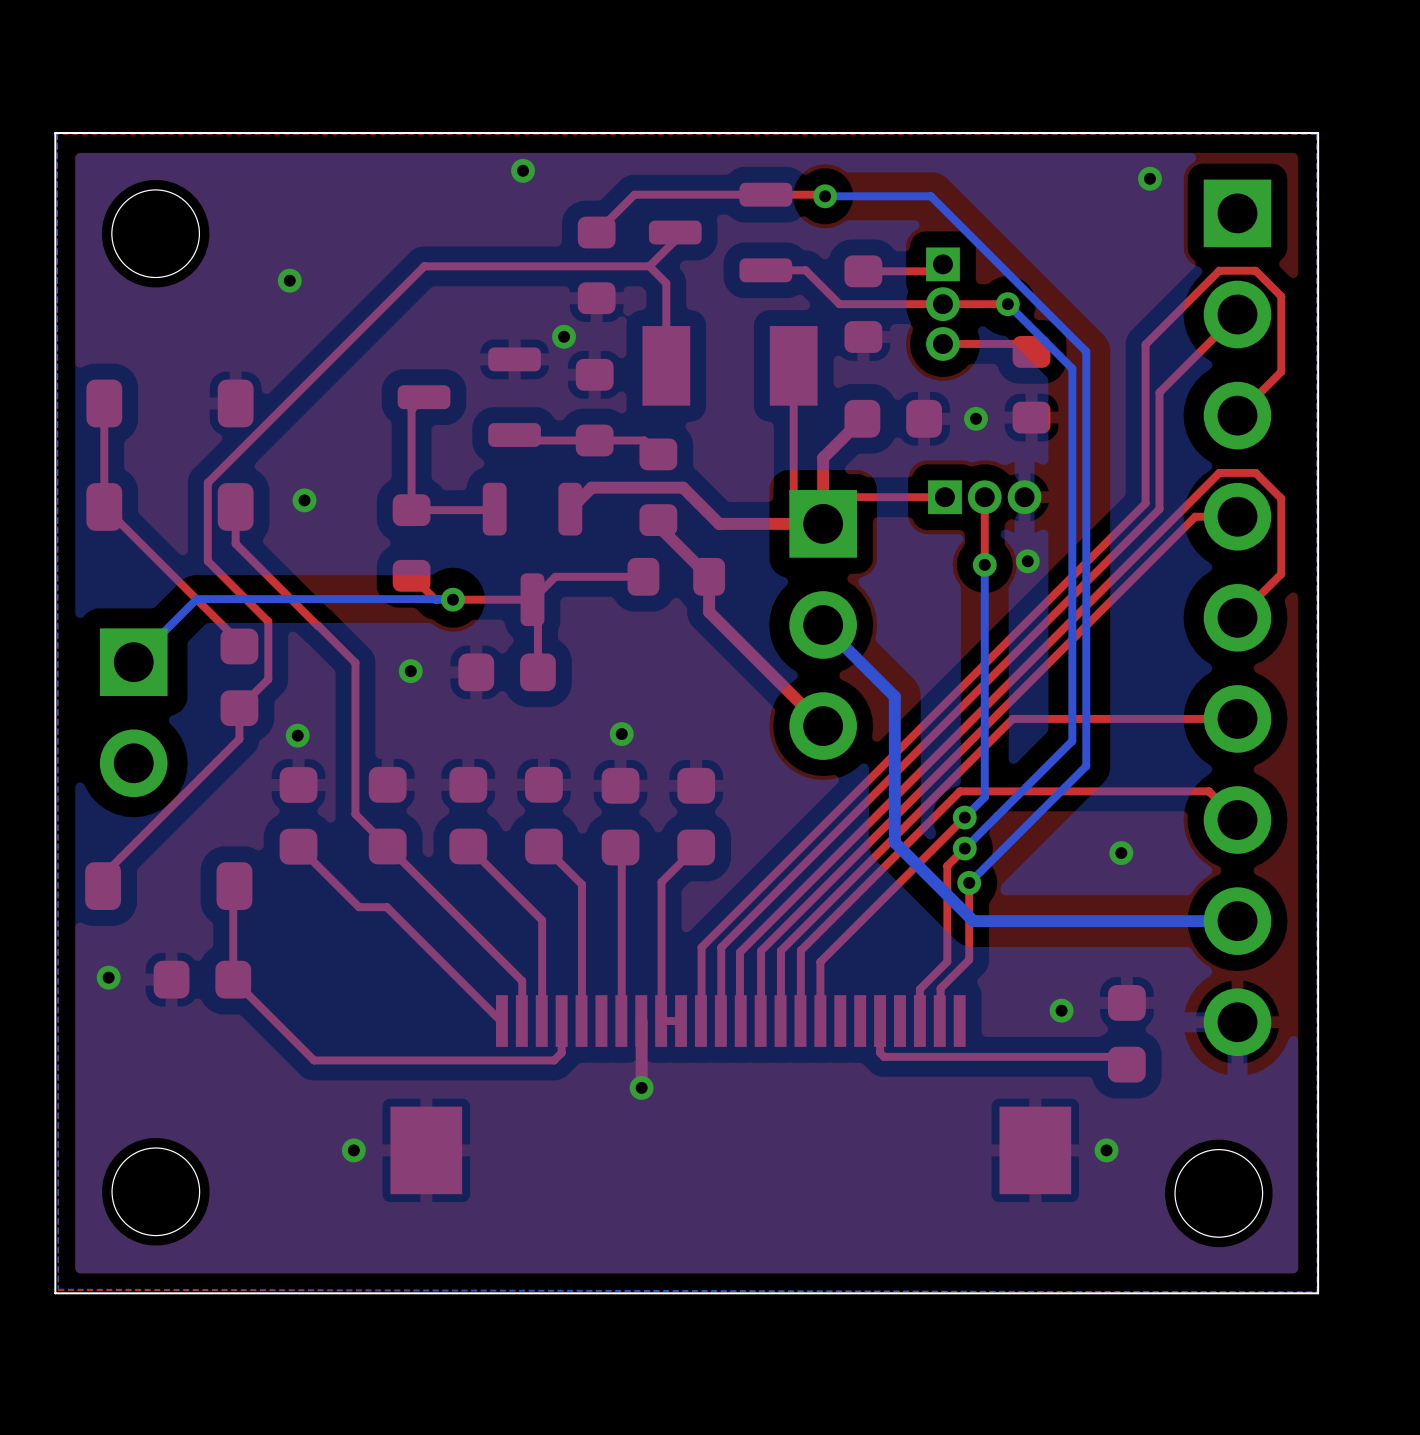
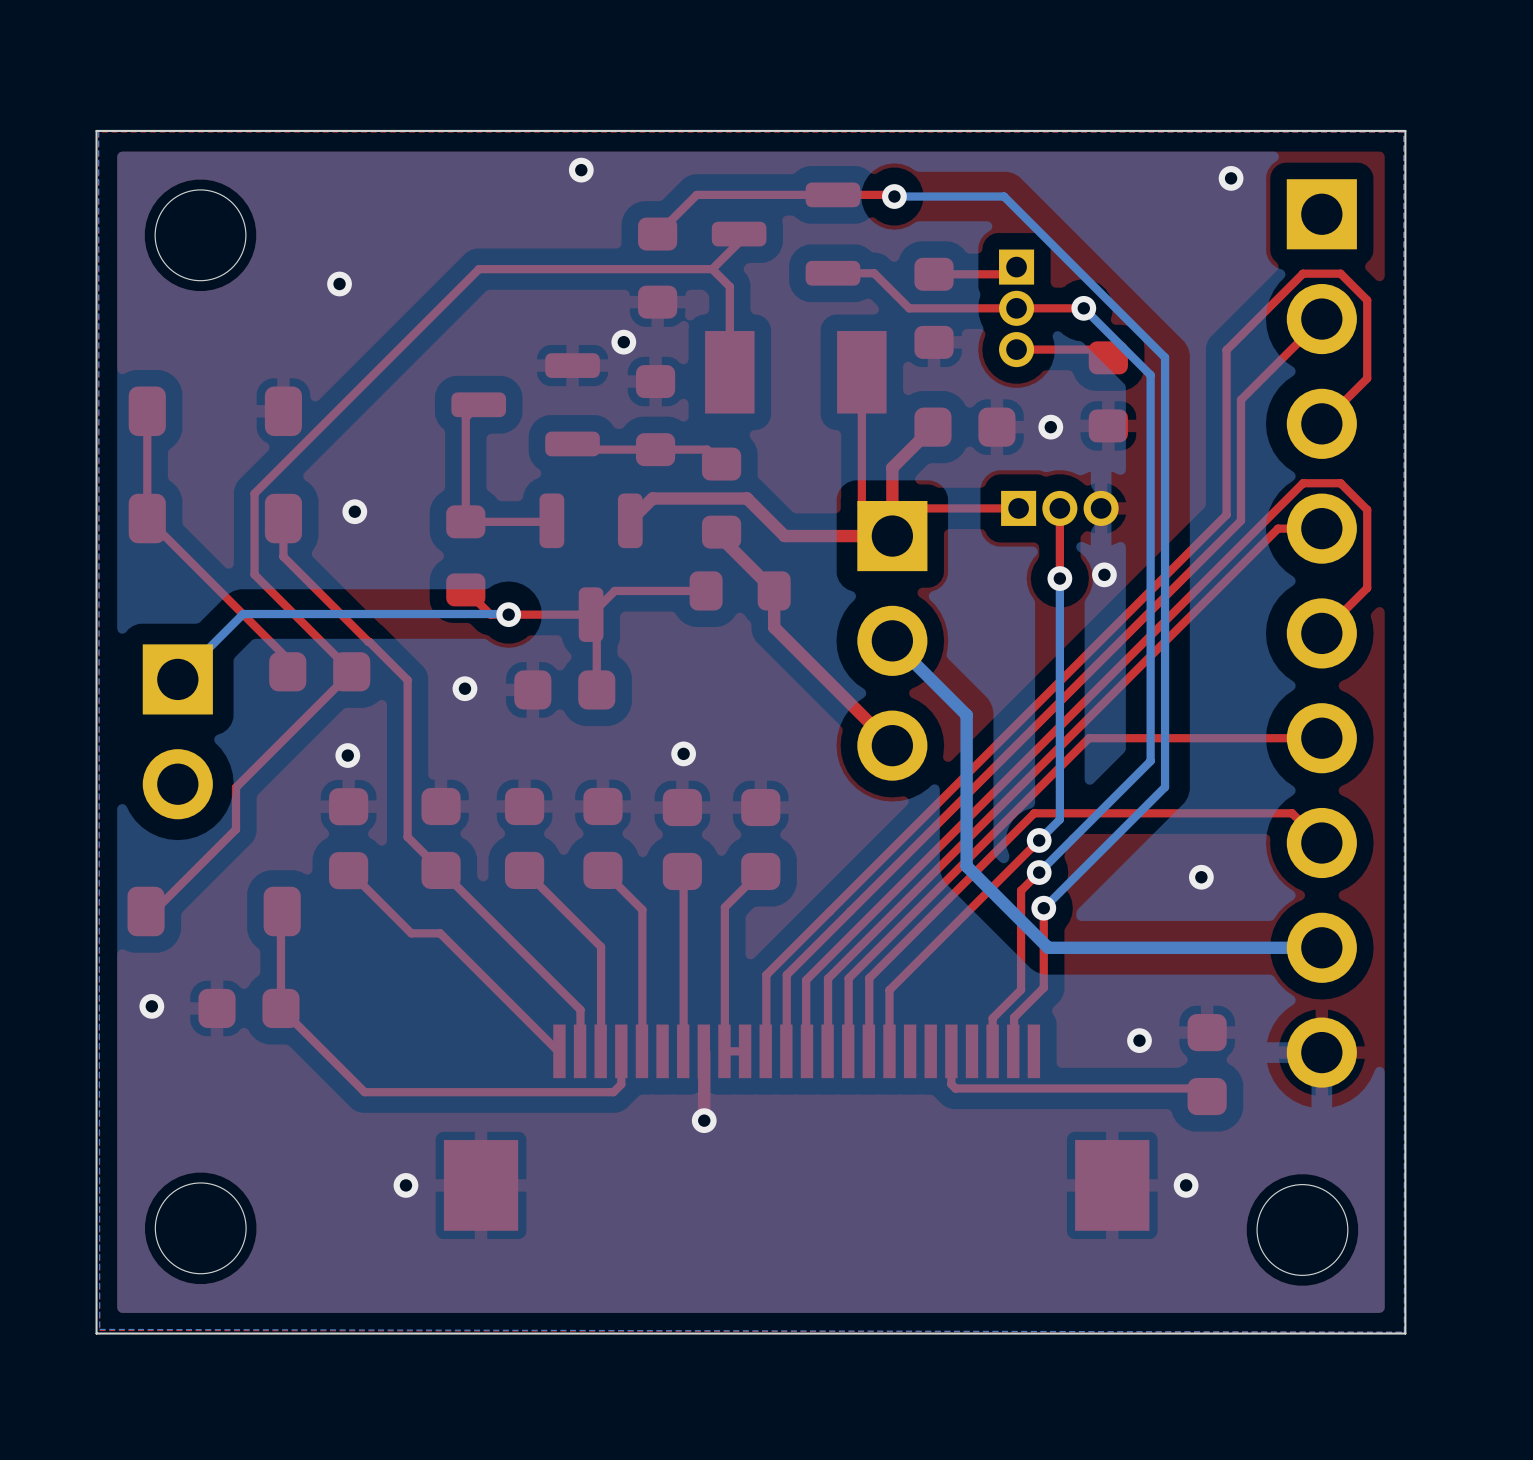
top track: (268, 621) (268, 679) (239, 708) (239, 739) (103, 875) (103, 886) -> (317, 637) (351, 671) (235, 787) (235, 829) (153, 911) (146, 911)
part rotation: 0° (239, 677) -> 90° clockwise (319, 671)

